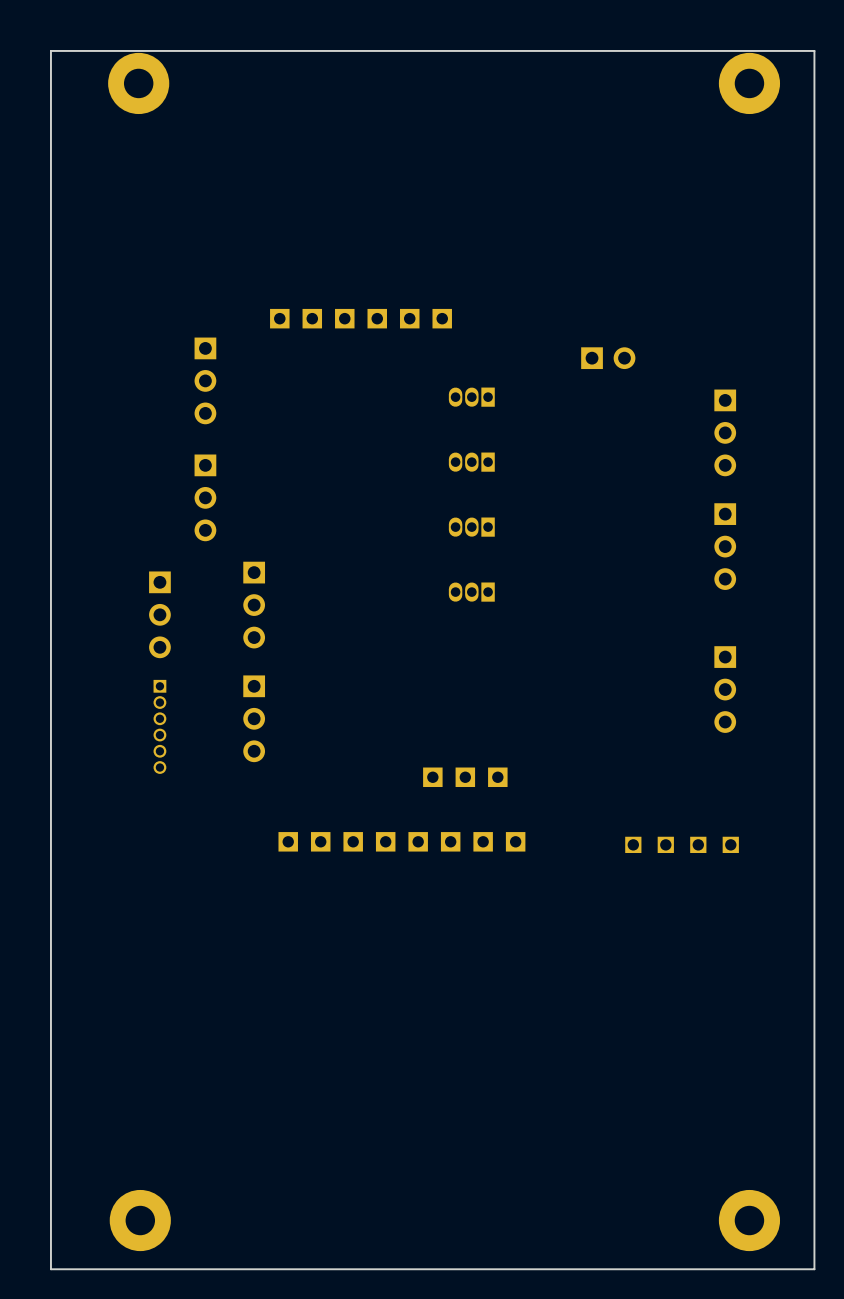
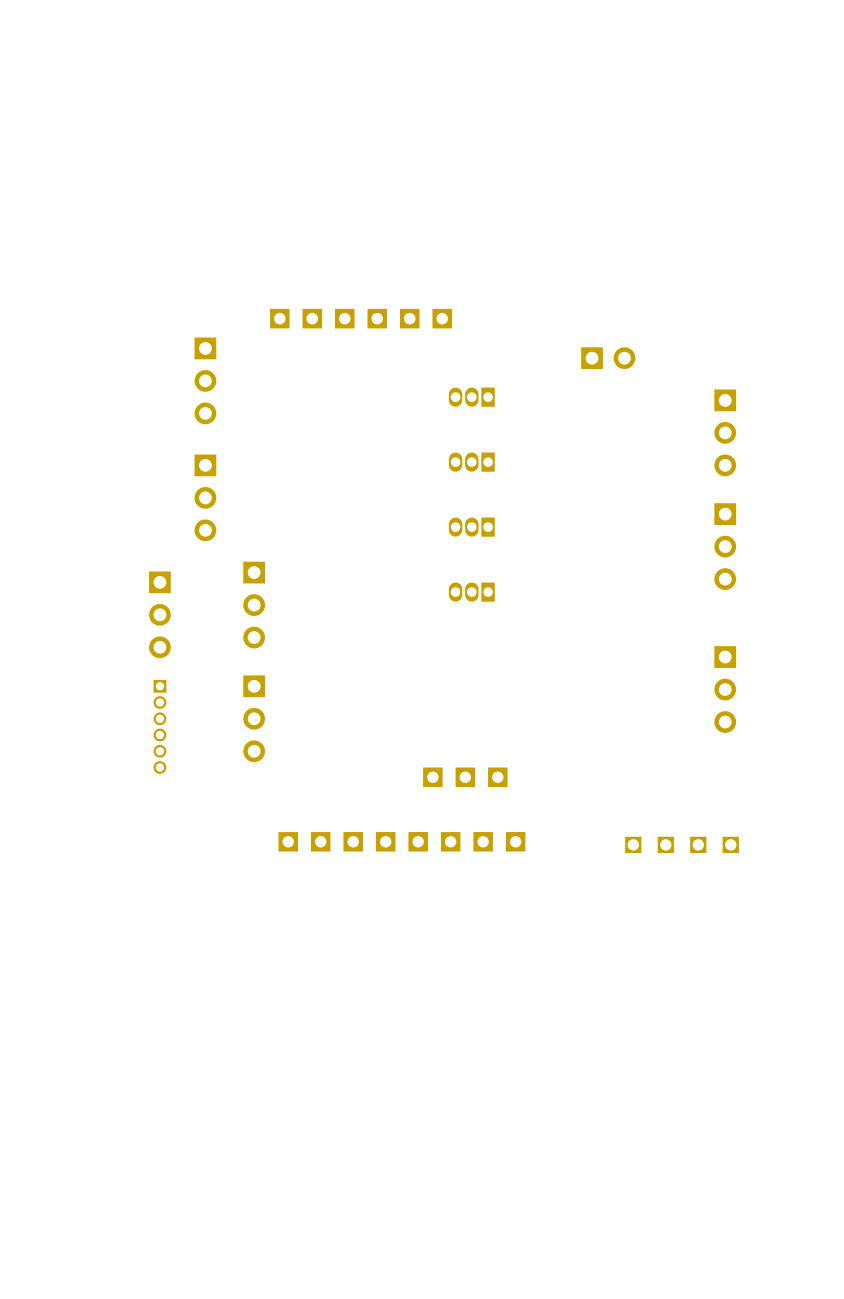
board edge: (814, 50) (814, 1269) (50, 1269) (50, 50) (814, 50) -> none
part: (138, 83) -> none
part: (749, 83) -> none
part: (140, 1220) -> none
part: (749, 1220) -> none

